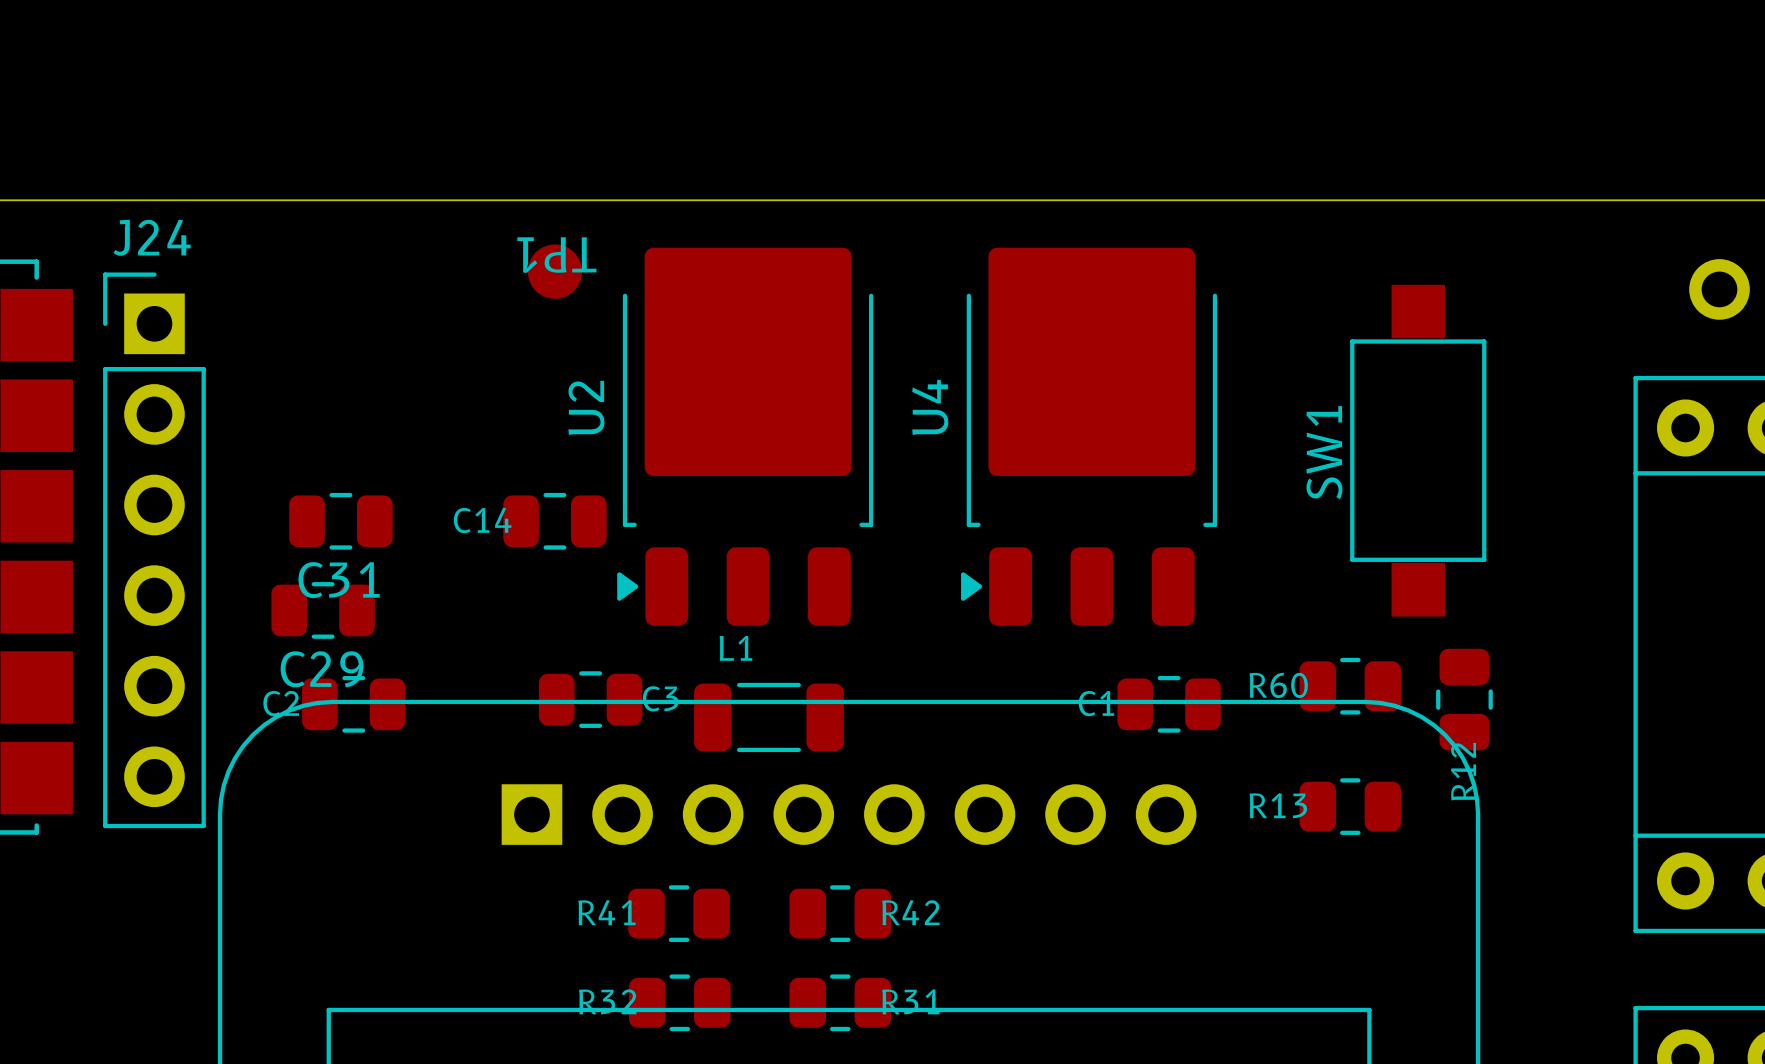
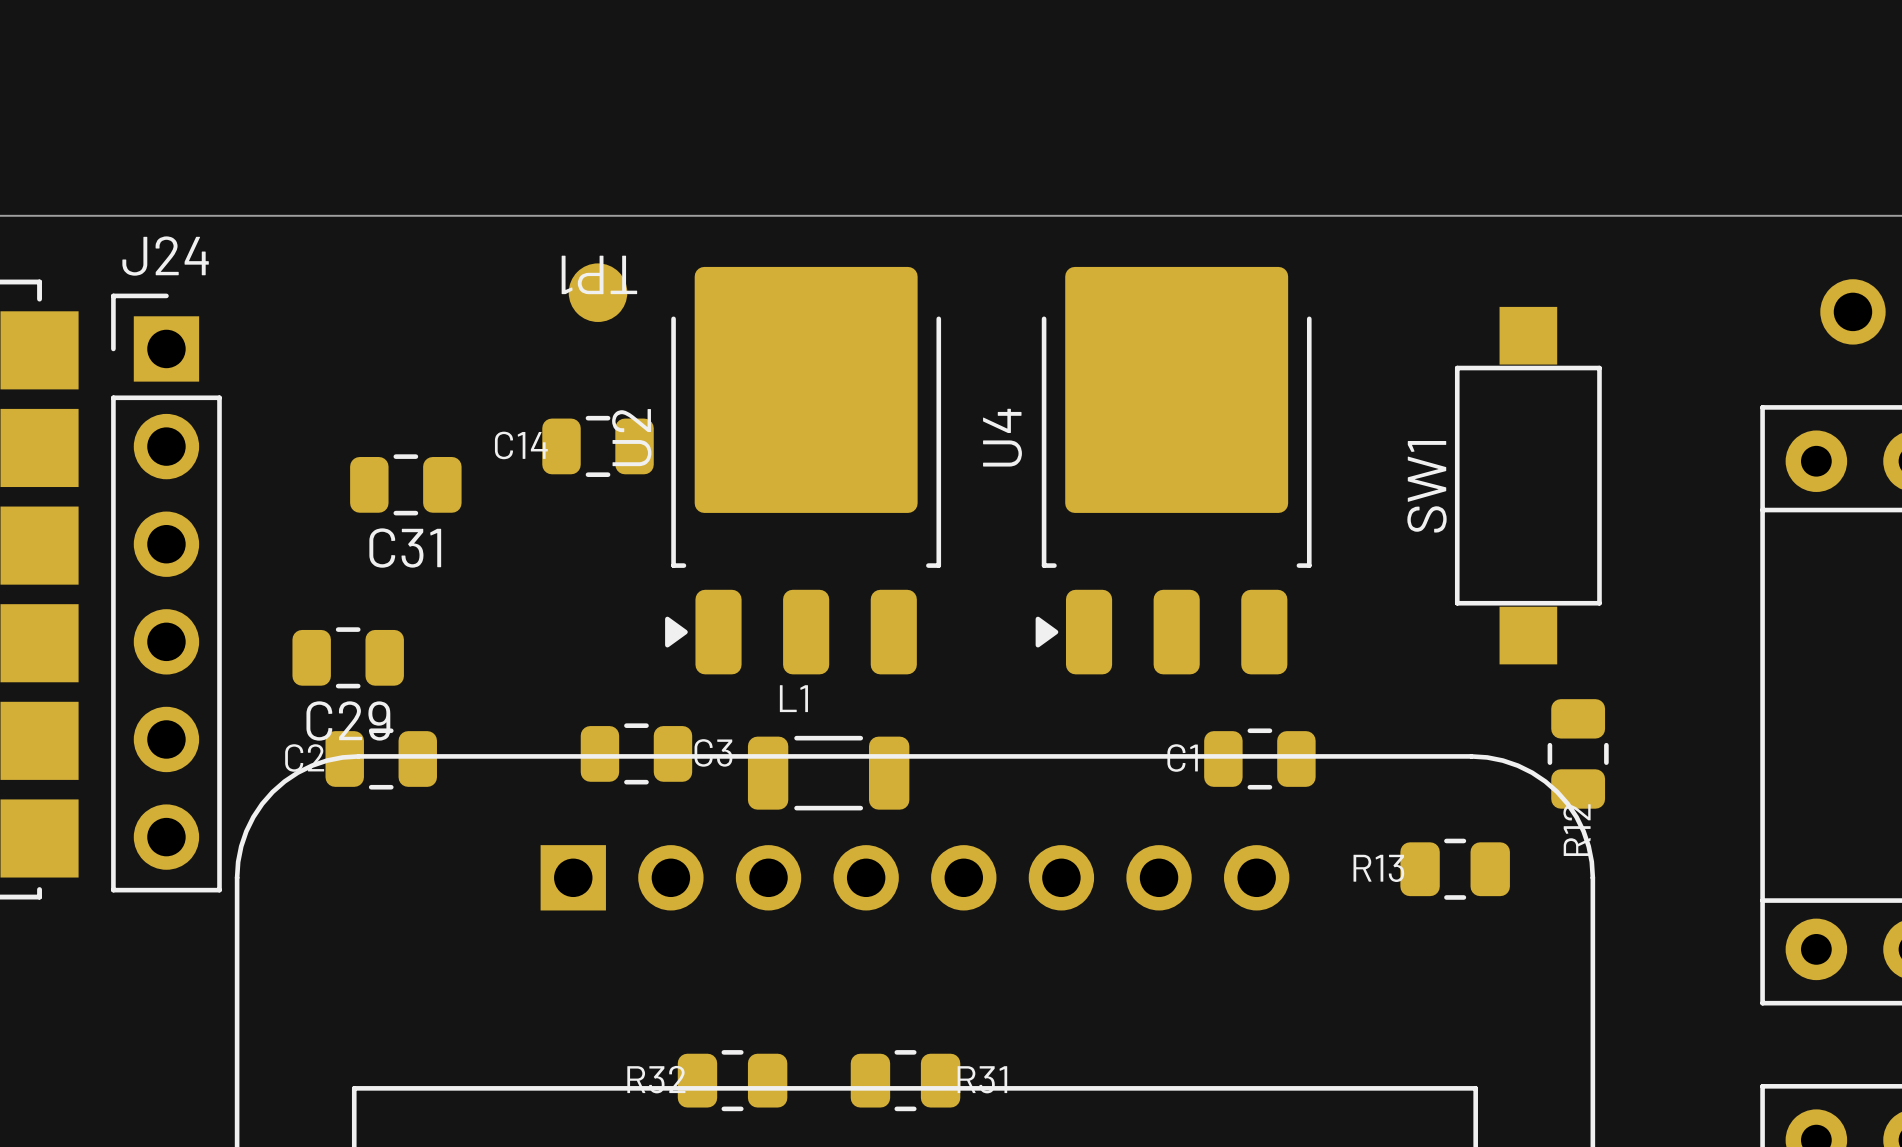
C31 position: (340, 521) -> (405, 484)
C14 position: (554, 521) -> (598, 446)
R60: (1350, 686) -> none
R41: (679, 913) -> none
R42: (840, 913) -> none

